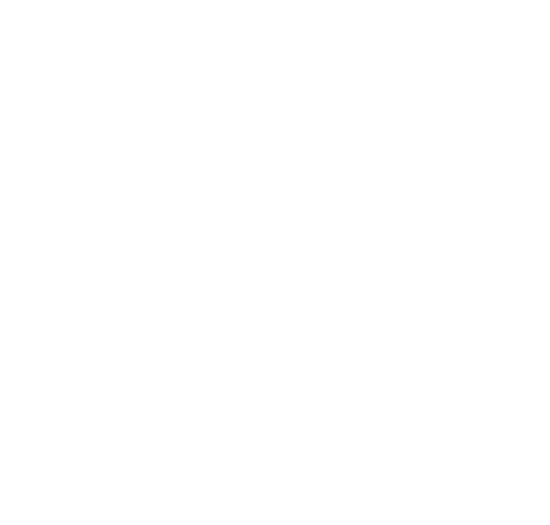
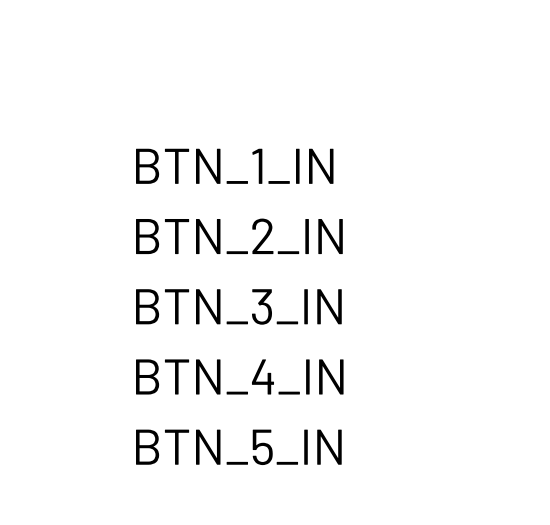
label: none -> BTN_1_IN (234, 166)
label: none -> BTN_2_IN (239, 236)
label: none -> BTN_3_IN (238, 306)
label: none -> BTN_4_IN (239, 376)
label: none -> BTN_5_IN (238, 447)

